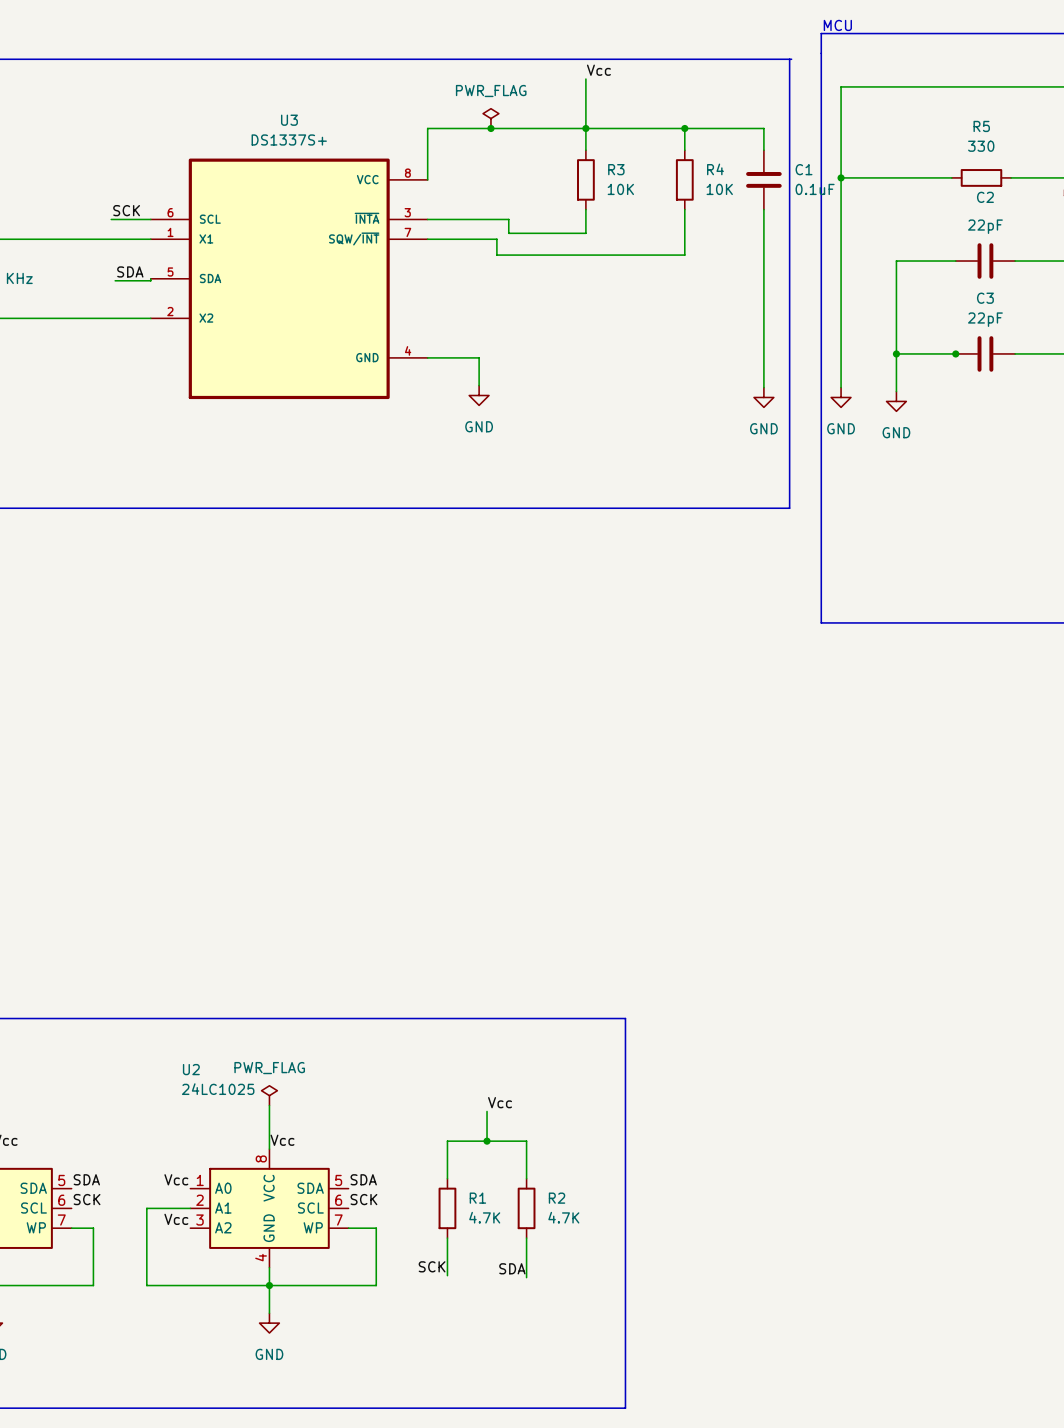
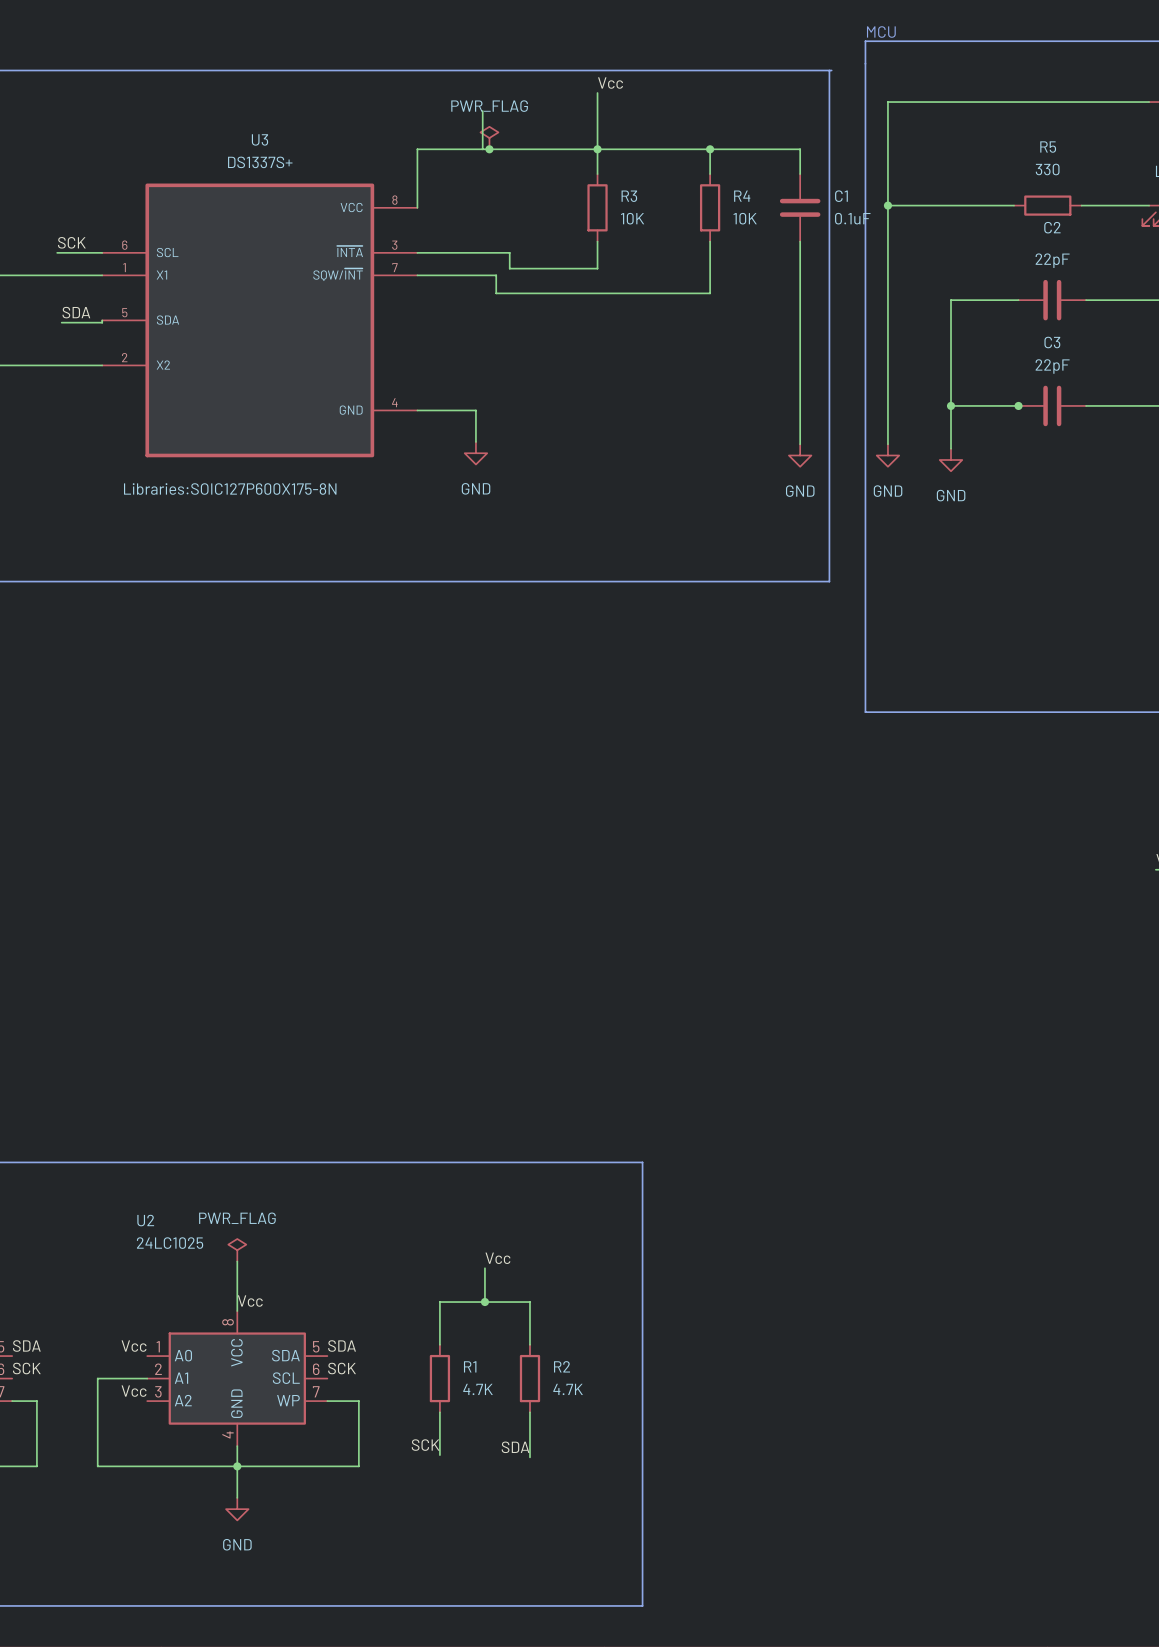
wire: none -> (482, 111) (482, 149)
U3 text: none -> Libraries:SOIC127P600X175-8N (230, 489)

